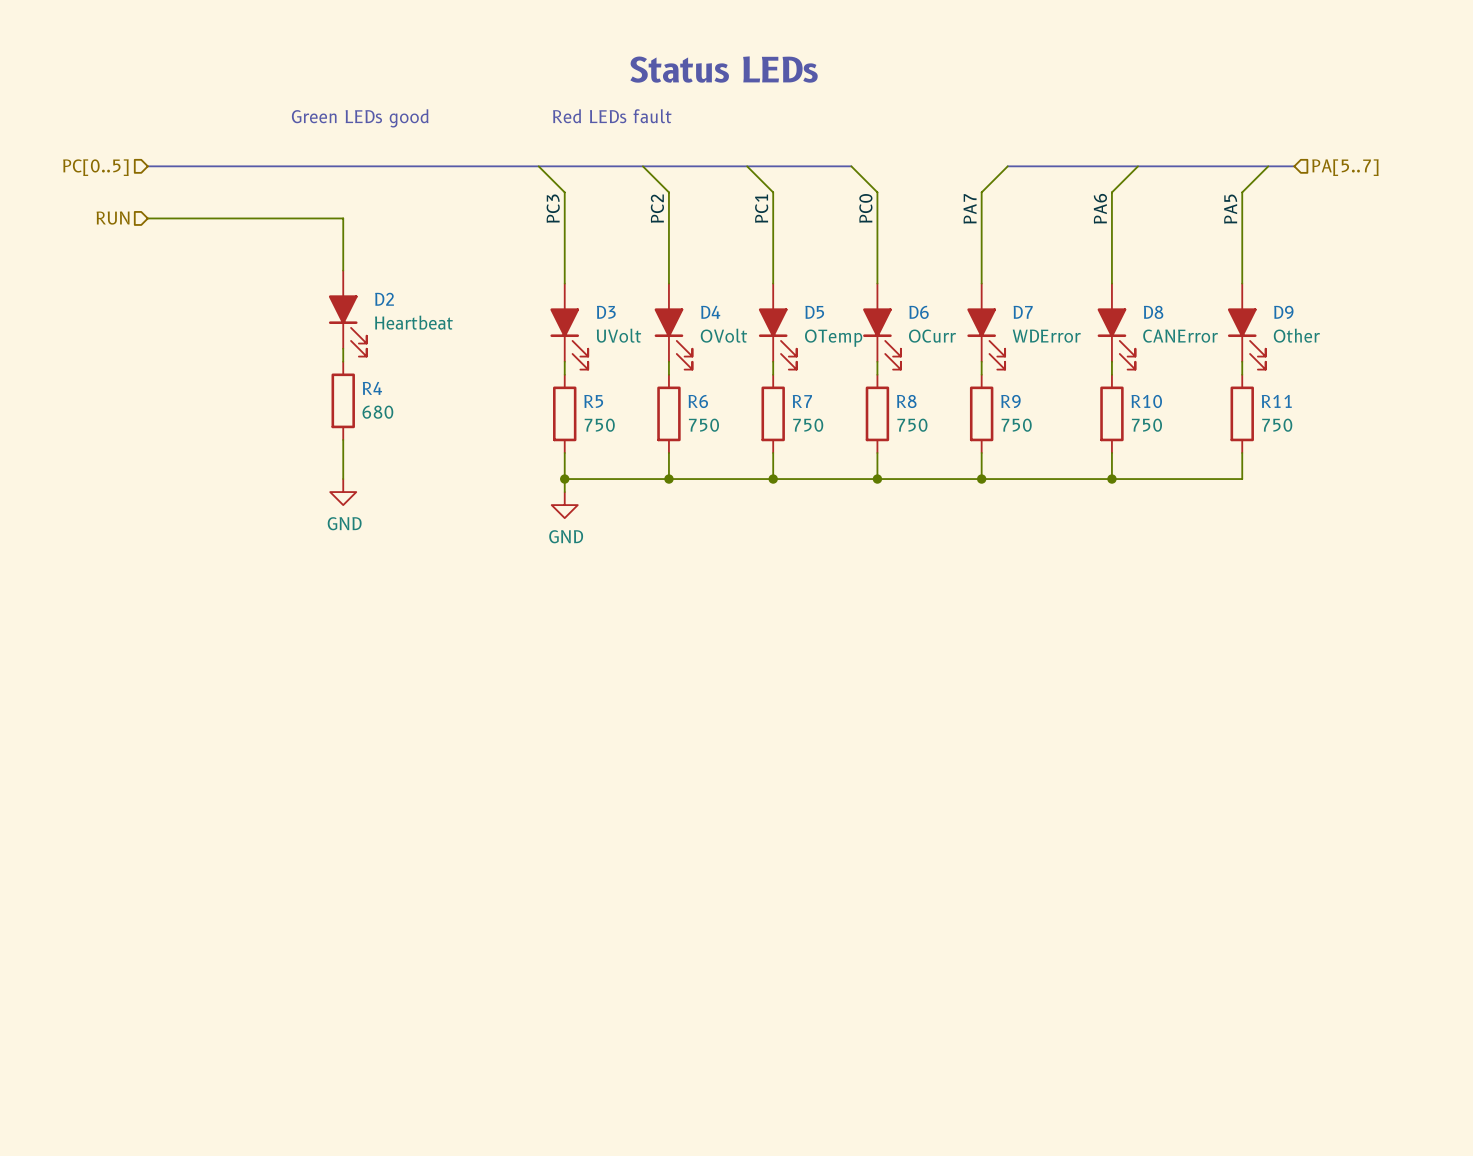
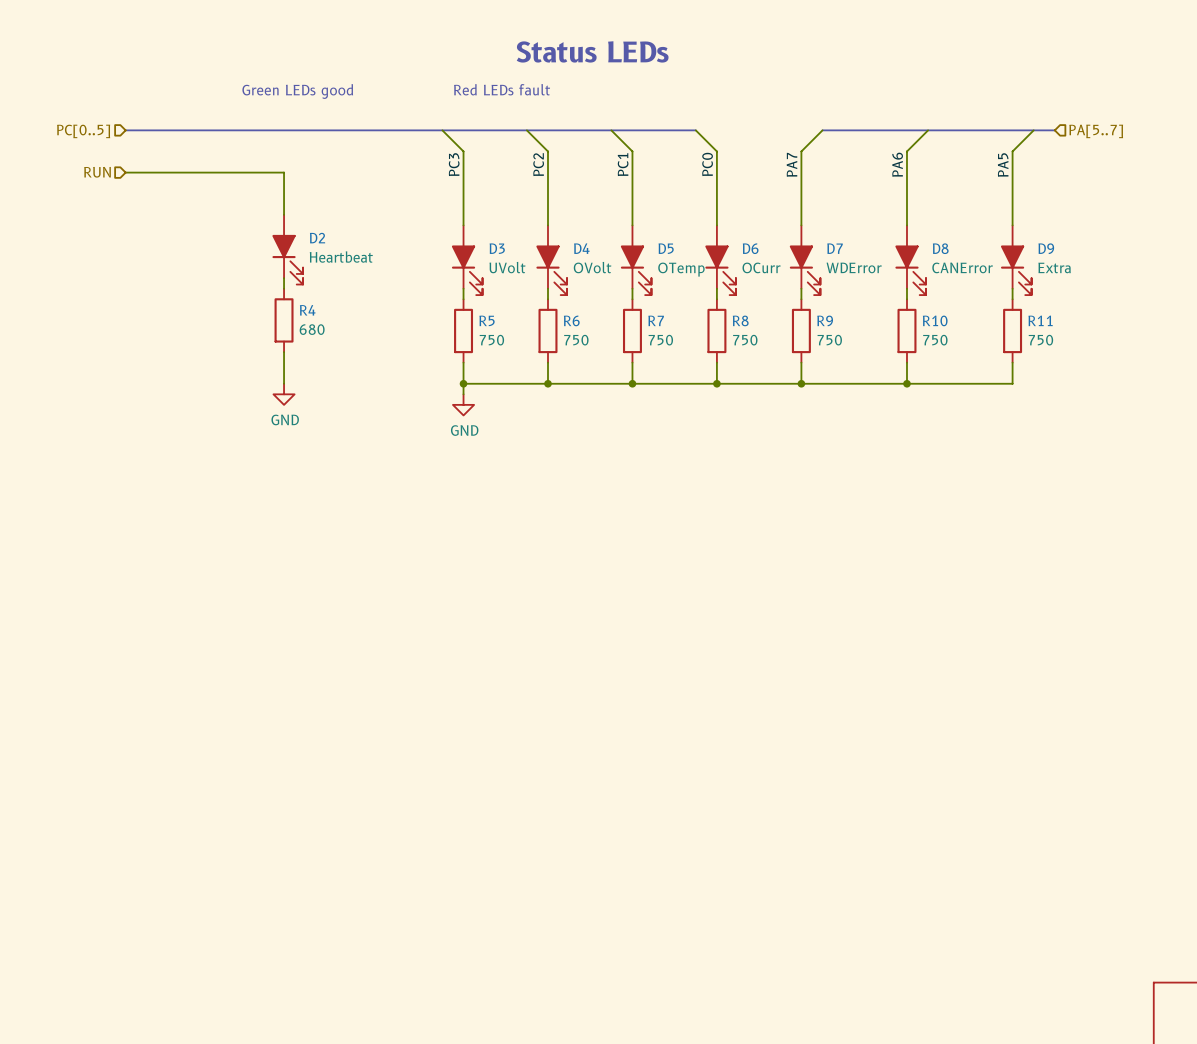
D9 value: Other (1296, 335) -> Extra (1054, 267)

